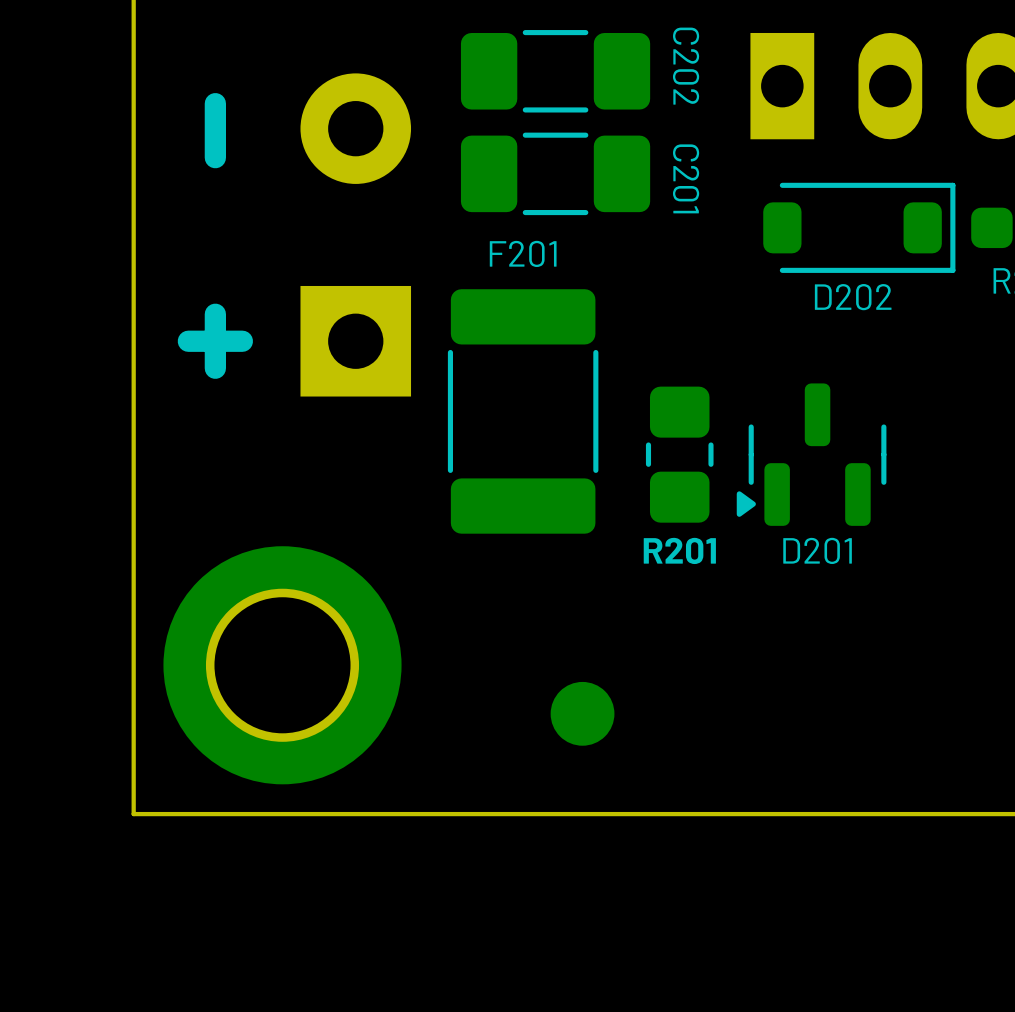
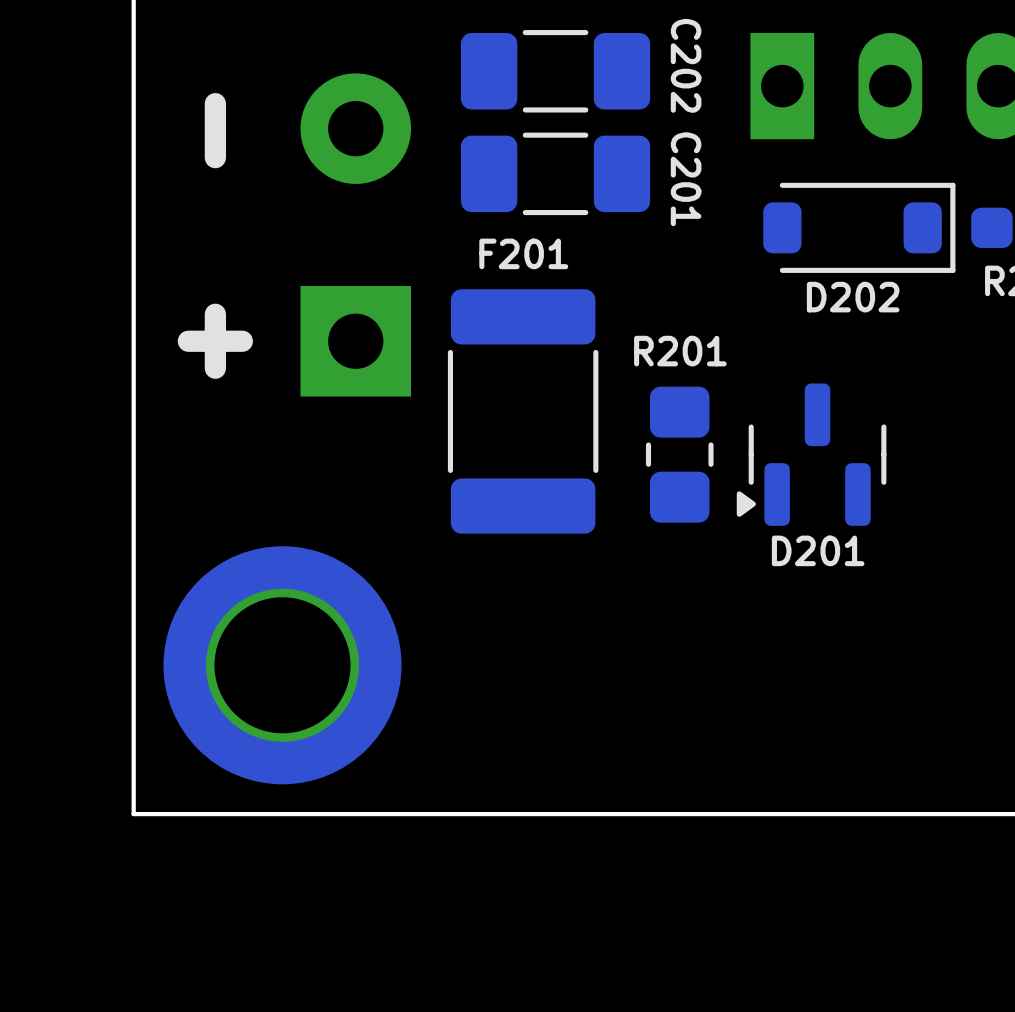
R201 name position: R201 (679, 550) -> R201 (680, 351)
part: (582, 713) -> none

